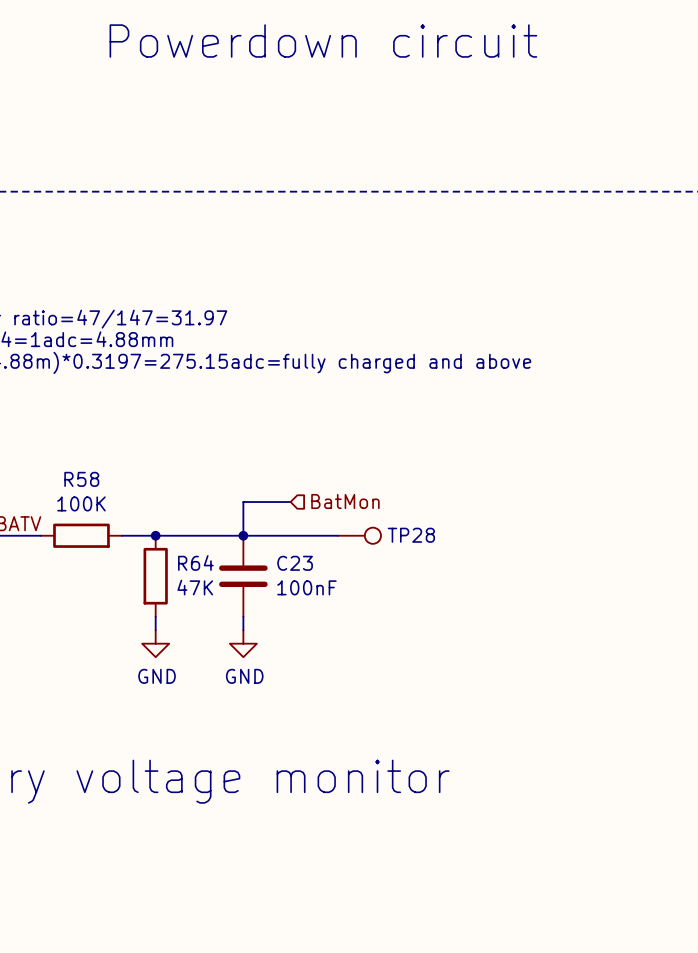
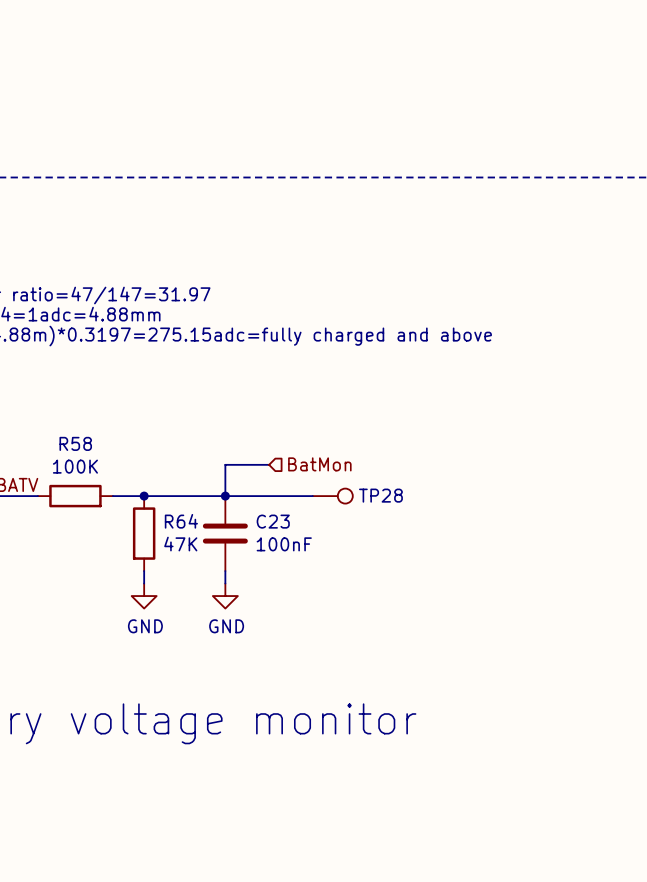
text: Powerdown circuit (323, 41) -> none

